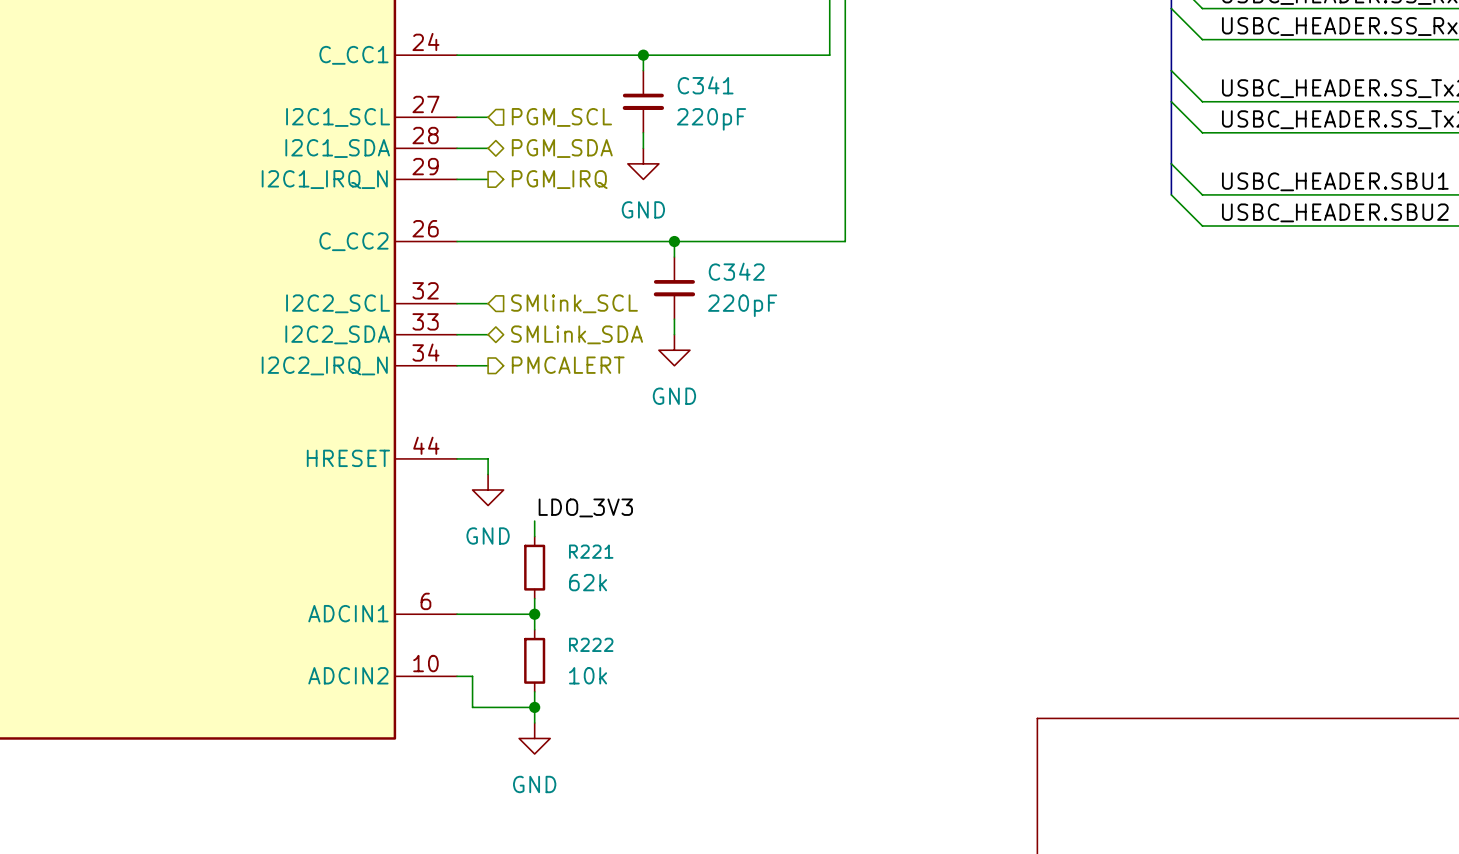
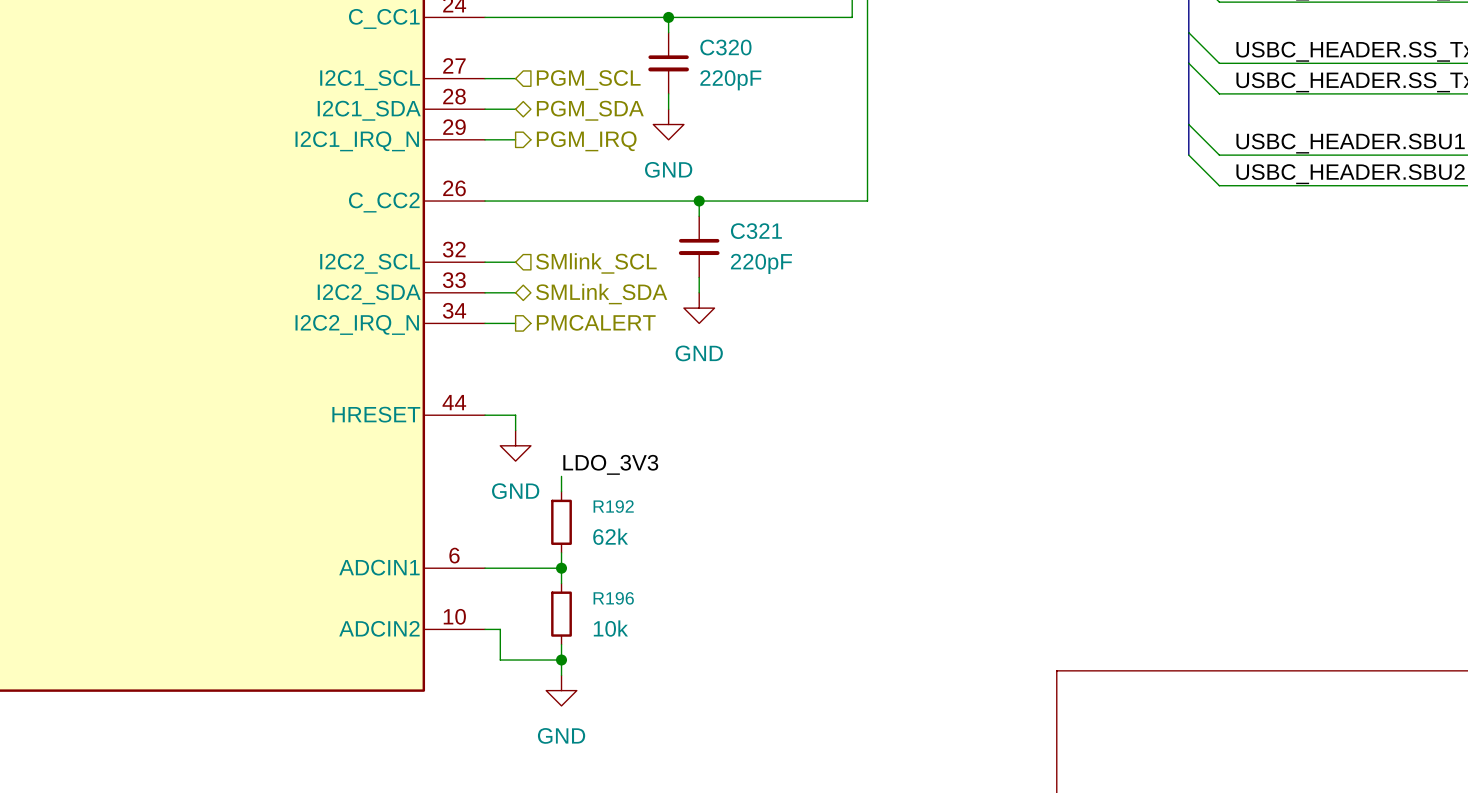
C341 name: C341 (705, 85) -> C320 (725, 47)
C342 name: C342 (736, 271) -> C321 (756, 231)
R221 name: R221 (591, 551) -> R192 (613, 506)
R222 name: R222 (591, 644) -> R196 (613, 598)

